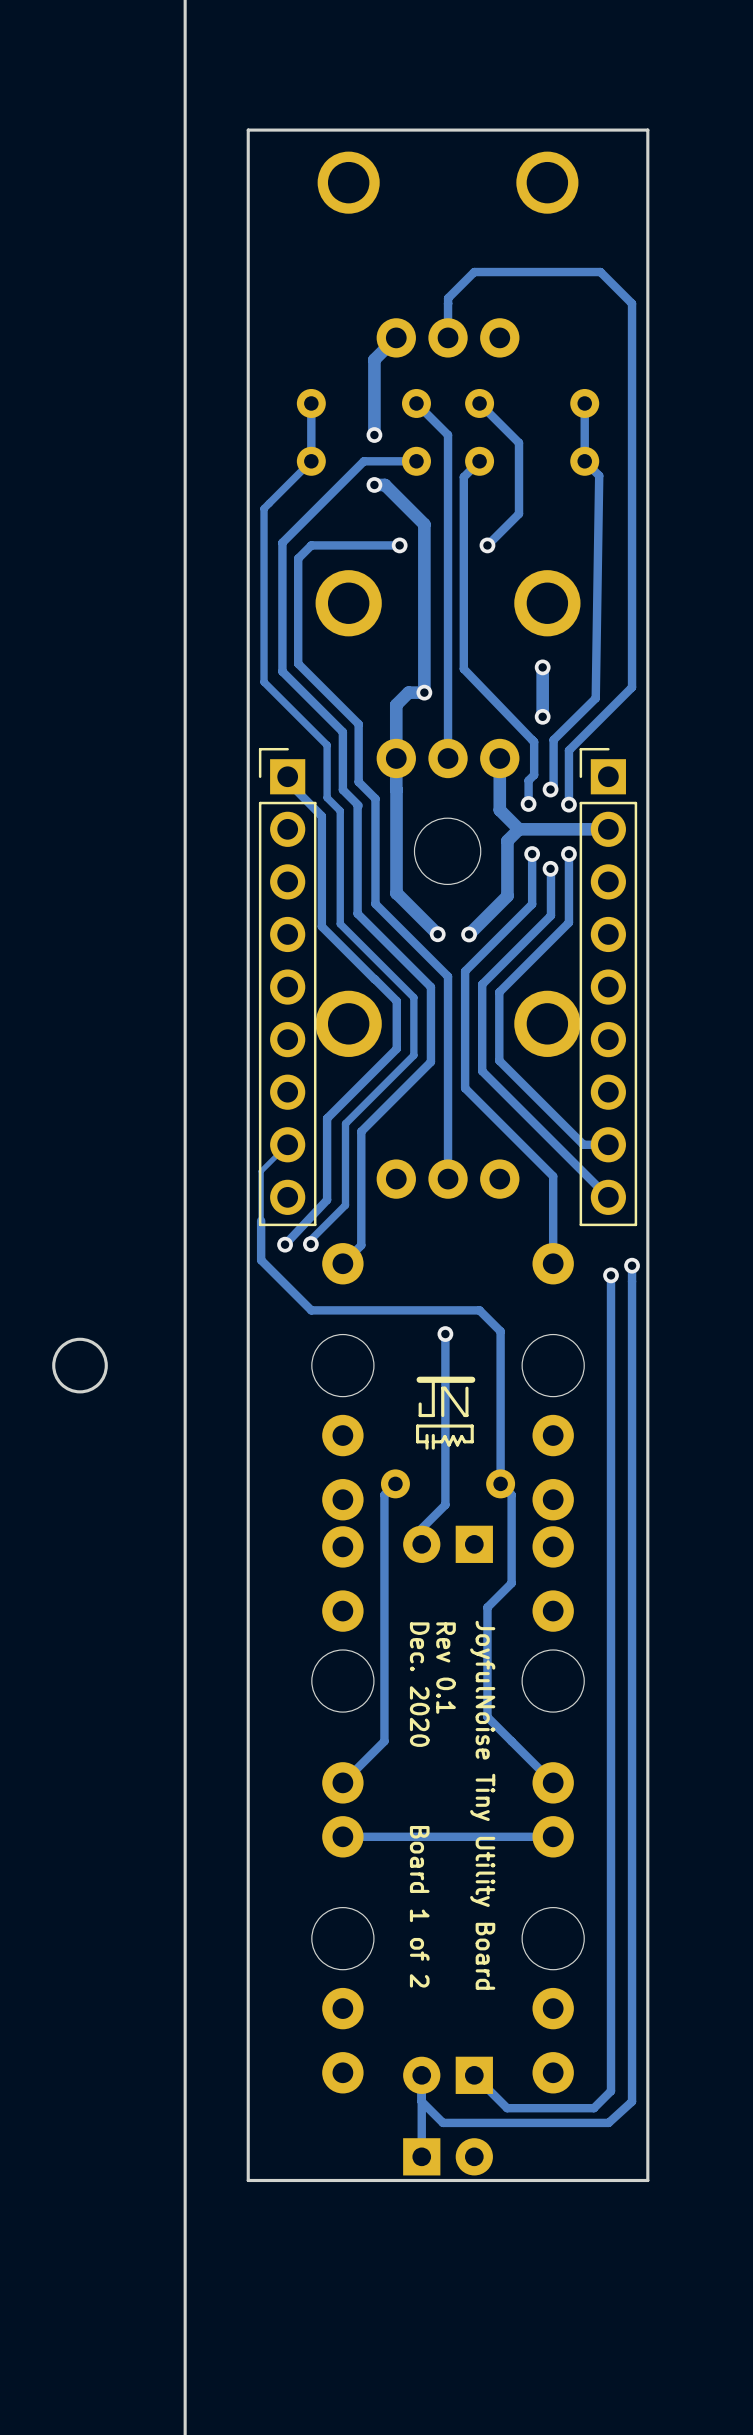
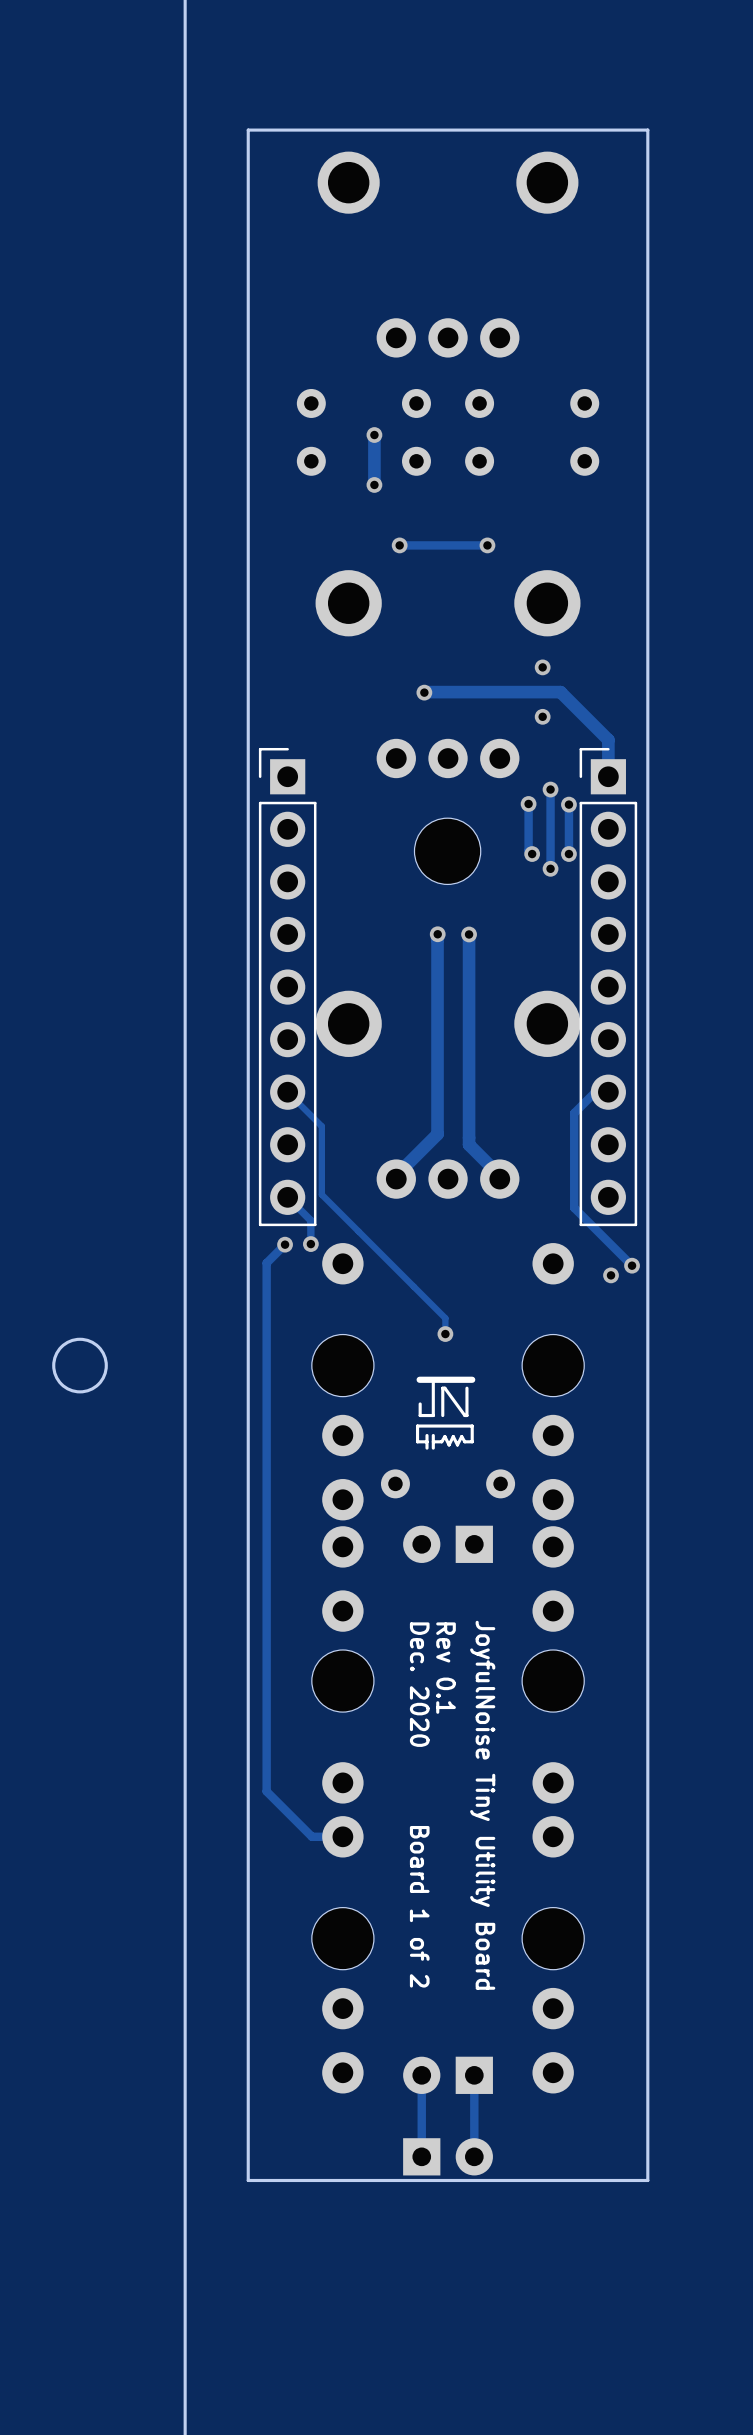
track: (396, 337) (374, 359) (374, 435) -> (374, 484) (374, 435)
track: (448, 337) (448, 298) (474, 272) (600, 272) (632, 303) (632, 687) (568, 750) (568, 804) -> none
track: (311, 403) (311, 461) (264, 508) (264, 682) (327, 745) (327, 797) (340, 810) (340, 923) (413, 997) (413, 1055) (345, 1123) (345, 1205) (310, 1239) -> (287, 1197) (310, 1220) (310, 1239)
track: (416, 403) (448, 435) (448, 758) -> none
track: (479, 403) (519, 442) (519, 513) (487, 545) -> (399, 545) (487, 545)
track: (584, 403) (584, 461) (599, 475) (595, 698) (553, 739) (553, 786) (550, 789) -> none
track: (416, 461) (363, 461) (282, 542) (282, 671) (342, 732) (342, 789) (358, 805) -> none
track: (479, 461) (463, 477) (463, 668) (534, 741) (534, 775) (528, 780) (528, 803) -> (532, 854) (528, 850) (528, 803)
track: (374, 484) (384, 484) (424, 524) (424, 692) (408, 692) (396, 704) (396, 789) -> none
track: (399, 545) (311, 545) (298, 558) (298, 663) (358, 724) (358, 782) (375, 798) (375, 903) (448, 976) (448, 1179) -> none
track: (542, 667) (542, 716) -> none
track: none -> (424, 692) (560, 692) (608, 739) (608, 776)
track: (499, 758) (499, 810) (519, 829) -> none
track: (287, 776) (287, 781) (321, 816) (321, 926) (374, 979) -> none
track: (396, 790) (396, 893) (437, 934) -> (397, 1179) (396, 1179) (396, 1175) (437, 1134) (437, 934)
track: (357, 805) (357, 913) (430, 987) (430, 1061) (361, 1131) (361, 1245) (342, 1263) -> none
track: (606, 827) (608, 829) (519, 829) -> none
track: (519, 829) (507, 840) (507, 896) (469, 934) -> (499, 1179) (499, 1175) (469, 1144) (469, 934)
track: (532, 854) (532, 904) (465, 971) (465, 1088) (553, 1176) (553, 1263) -> none
track: (568, 854) (568, 922) (499, 992) (499, 1060) (583, 1144) (595, 1144) -> (568, 854) (568, 804)
track: (550, 869) (550, 915) (482, 984) (482, 1071) (608, 1197) -> (550, 868) (550, 789)
track: (374, 979) (396, 1001) (396, 1048) (327, 1118) (327, 1199) (285, 1244) -> none
track: (287, 1144) (261, 1171) (261, 1260) (311, 1310) (479, 1310) (500, 1331) (500, 1483) (511, 1494) (511, 1583) (487, 1607) (487, 1717) (553, 1782) -> none
track: (632, 1265) (632, 2101) (608, 2122) (443, 2122) (421, 2101) -> (632, 1265) (574, 1207) (574, 1113) (595, 1092) (608, 1092)
track: (611, 1275) (611, 2091) (593, 2108) (507, 2108) (474, 2075) -> (474, 2156) (474, 2075)
track: (445, 1334) (445, 1504) (421, 1528) (421, 1544) -> (445, 1334) (445, 1318) (321, 1194) (321, 1126) (287, 1092) (287, 1103)
track: (395, 1483) (384, 1494) (384, 1741) (342, 1782) -> none
track: (553, 1836) (342, 1836) -> (285, 1244) (266, 1263) (266, 1791) (312, 1836) (342, 1836)

